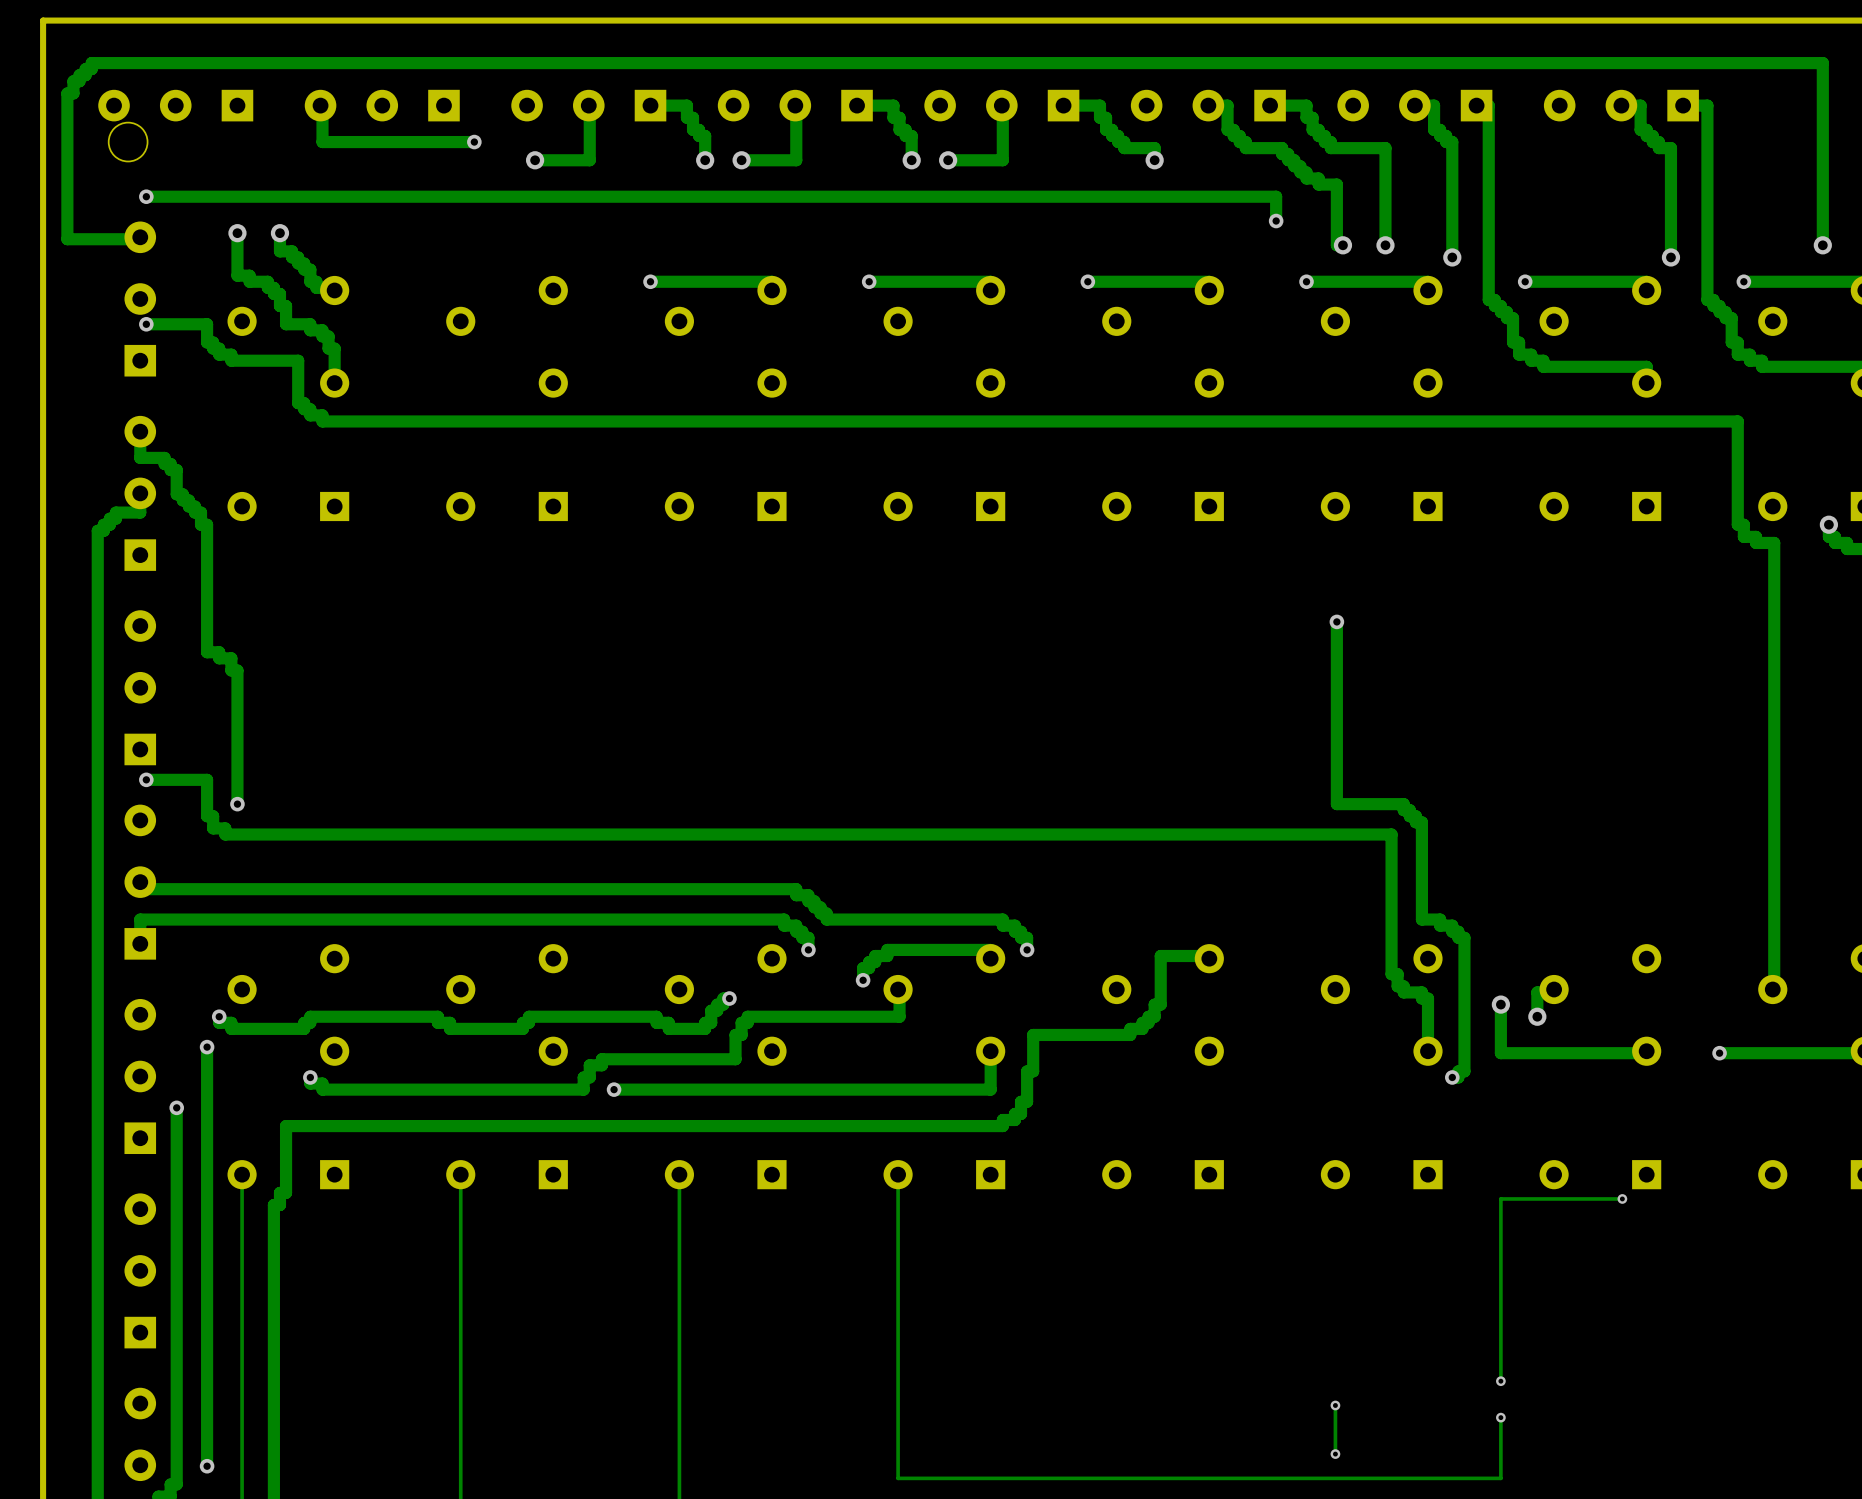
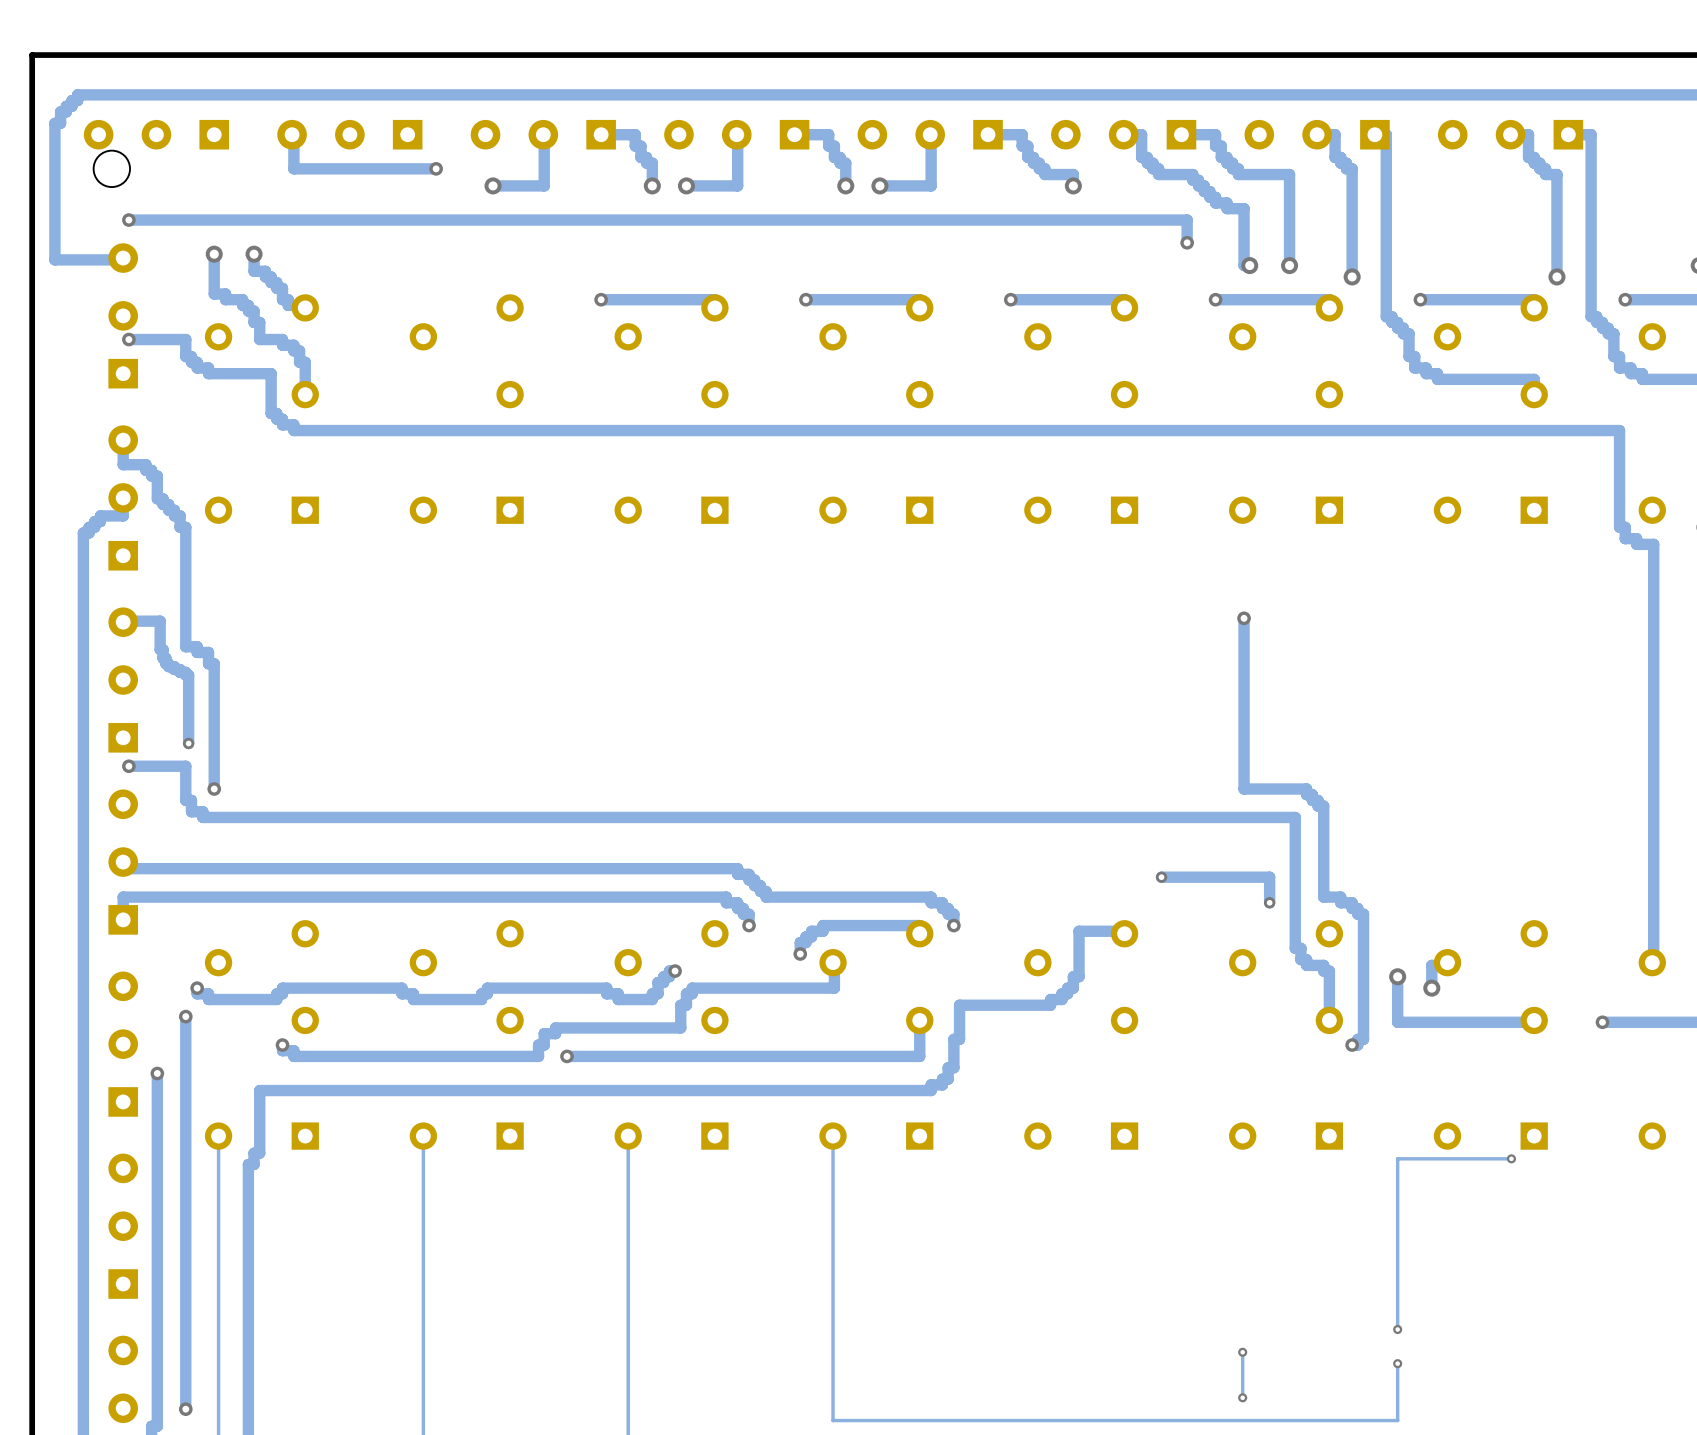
track: none -> (123, 622) (160, 621) (160, 649) (163, 649) (163, 658) (165, 658) (165, 663) (188, 675) (188, 743)
via: none -> (188, 743)
track: none -> (1161, 877) (1269, 877) (1269, 902)
via: none -> (1161, 877)
via: none -> (1269, 902)

